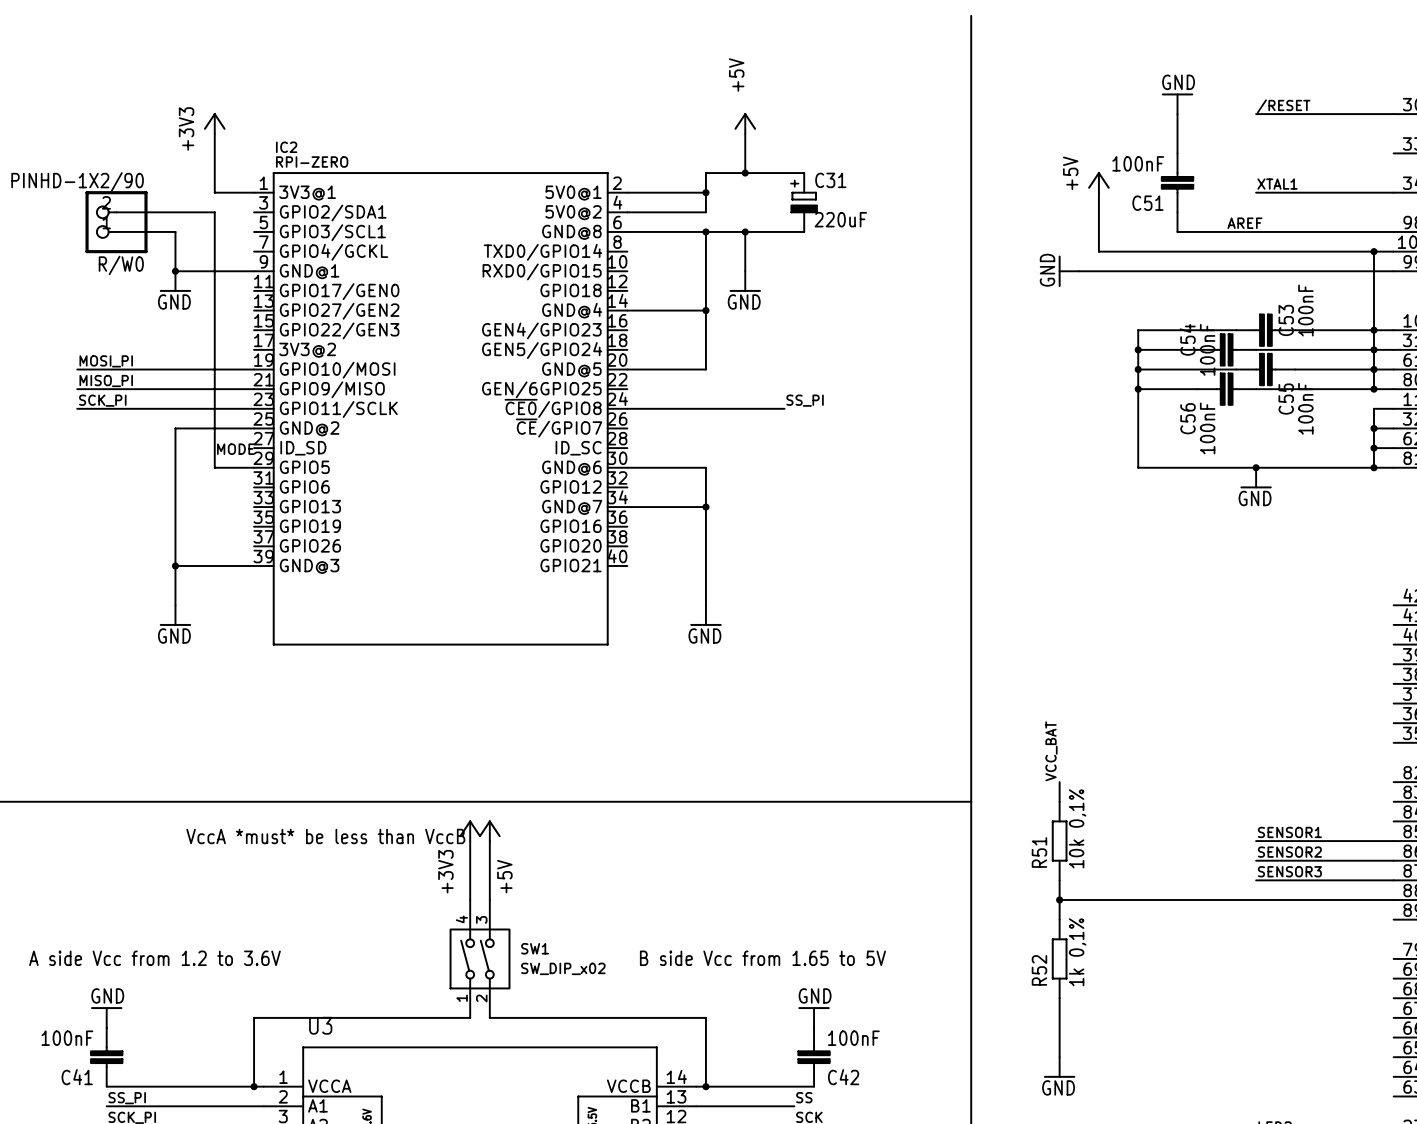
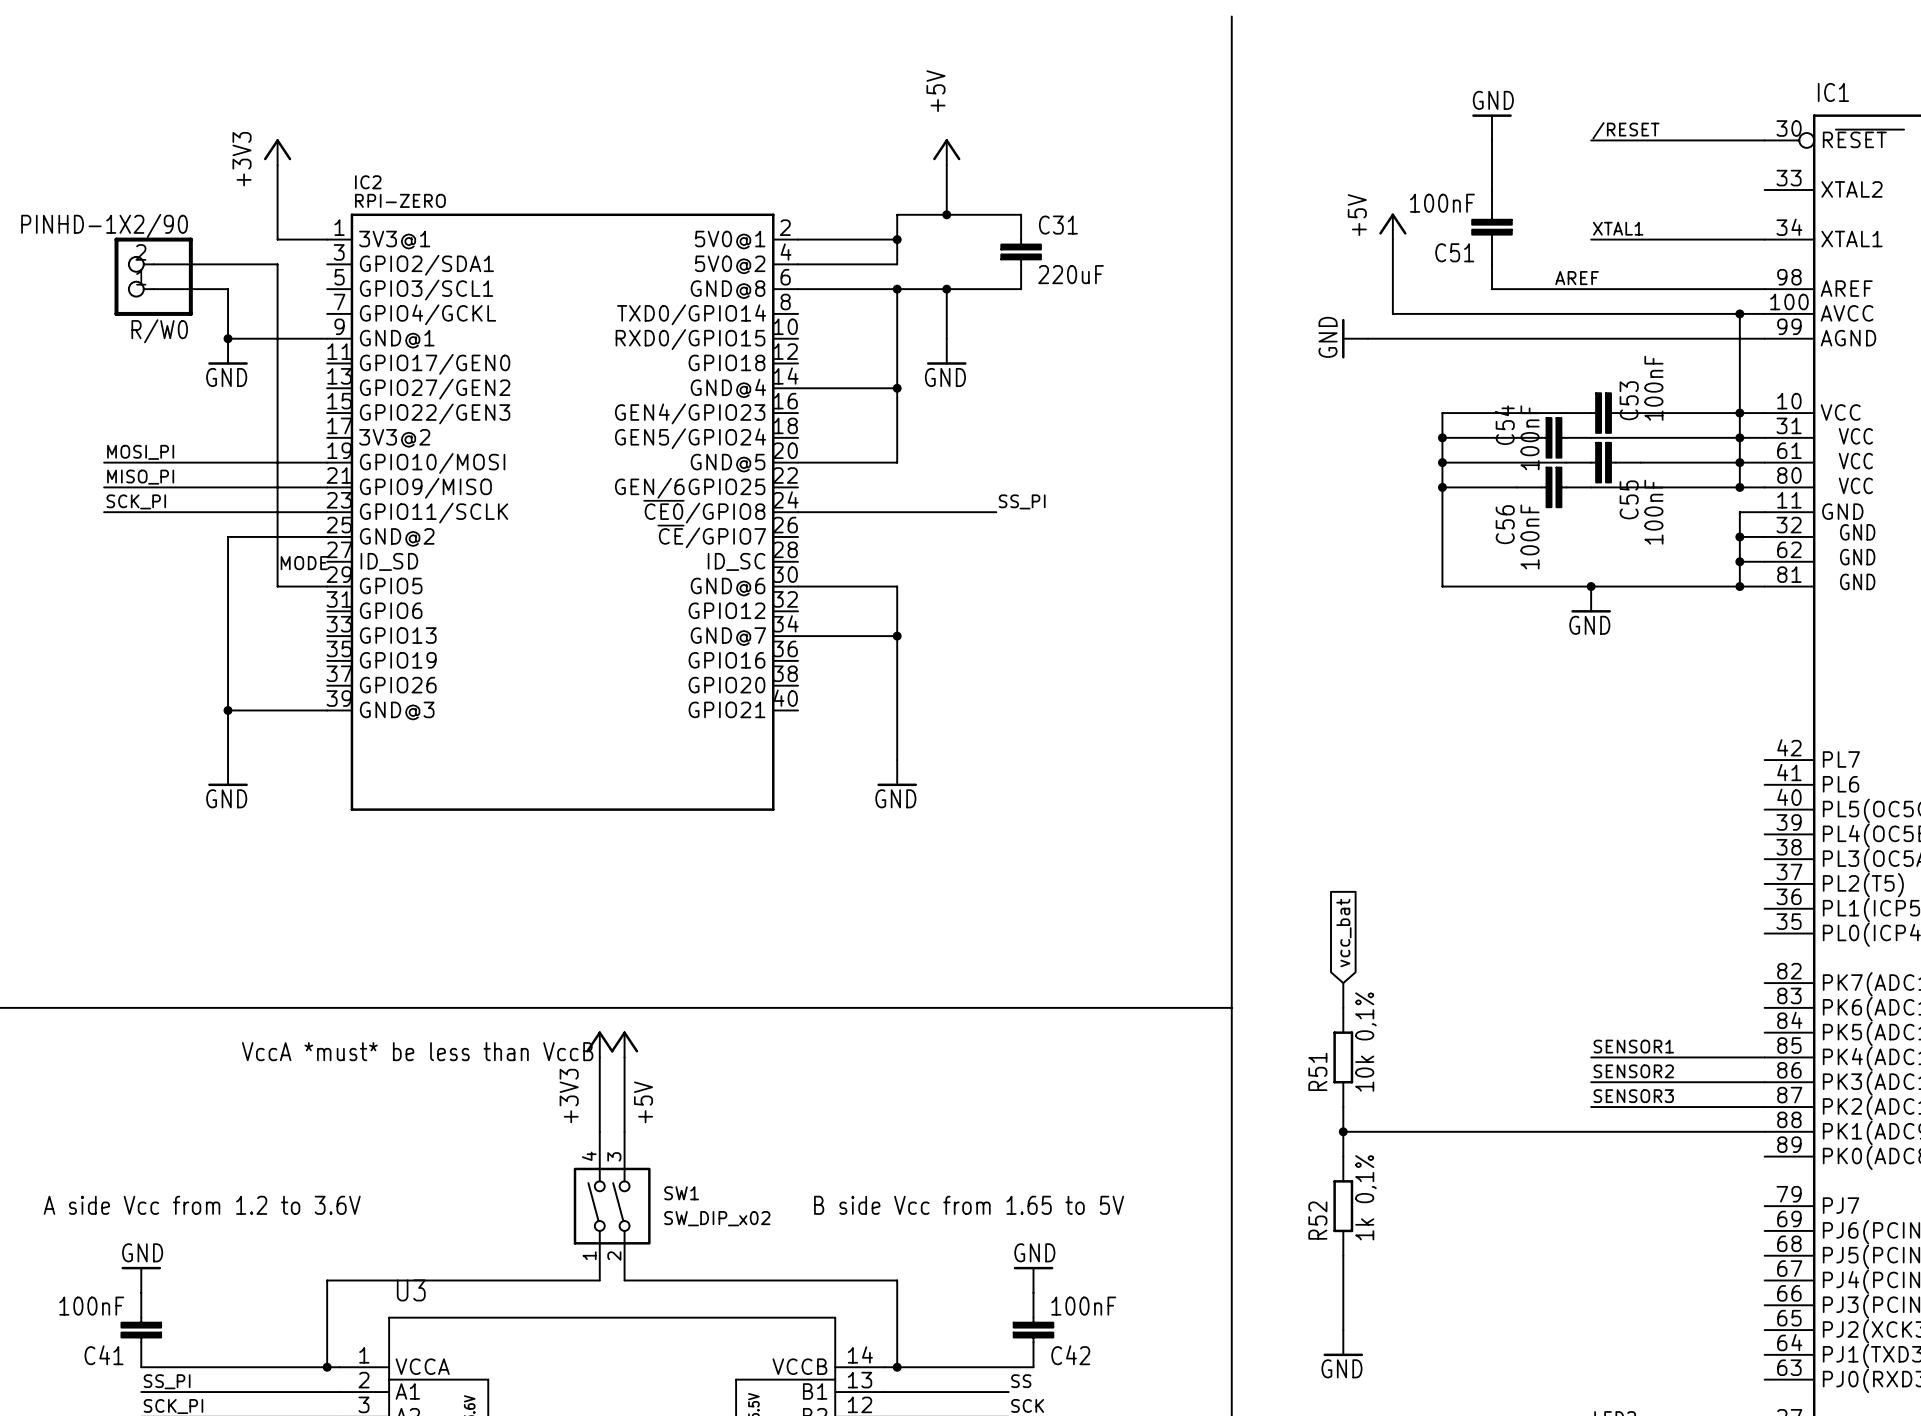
C31 symbol: [791, 173, 817, 232] -> [1001, 214, 1041, 290]
global label: none -> vcc_bat (1343, 933)
label: VCC_BAT (1051, 751) -> none

